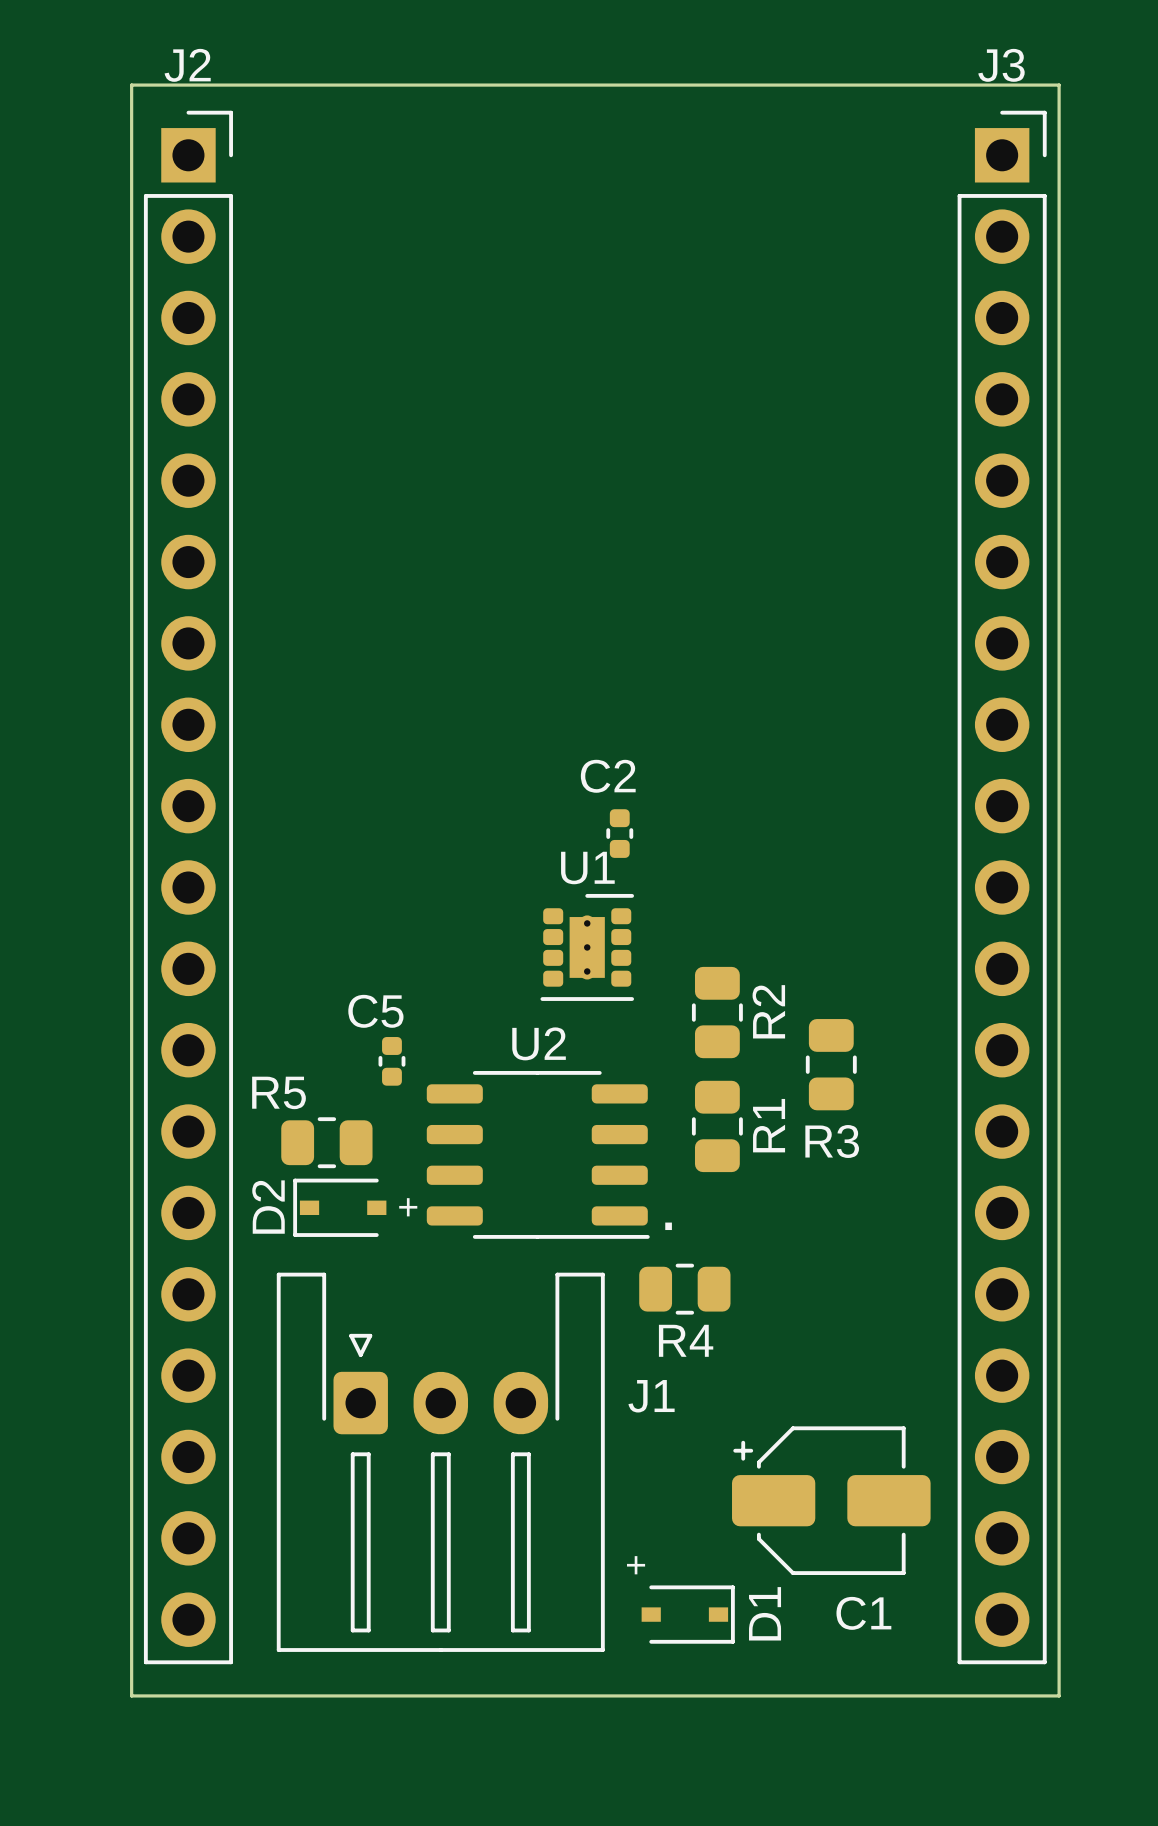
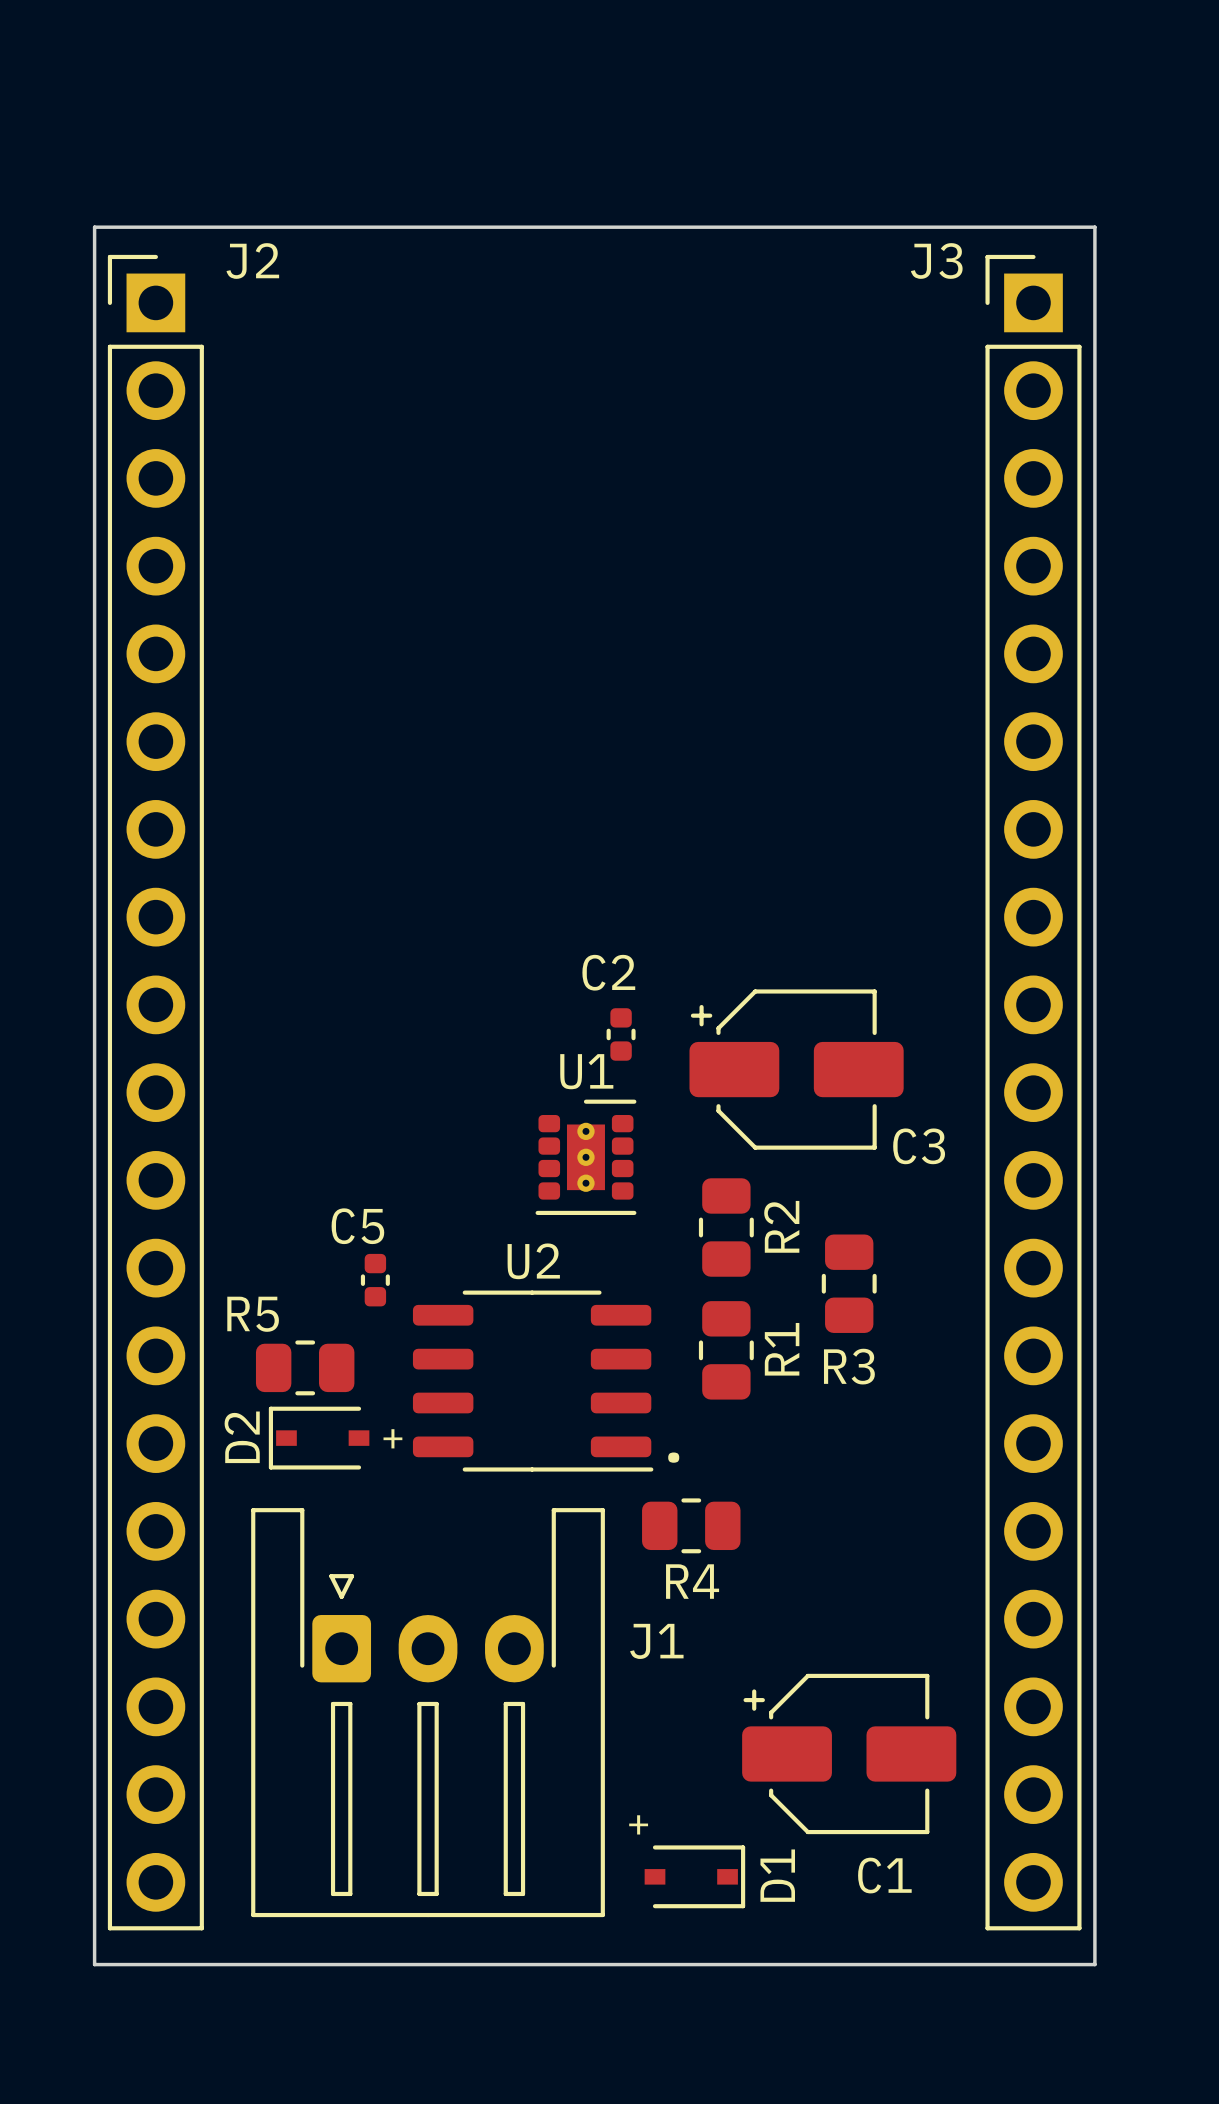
J2 name position: J2 (187, 65) -> J2 (252, 261)
J3 name position: J3 (1001, 65) -> J3 (936, 261)
J2 footprint: [143, 110, 233, 1665] -> [107, 254, 204, 1931]
J3 footprint: [957, 110, 1047, 1665] -> [985, 254, 1082, 1931]
C3: none -> (796, 1069)

